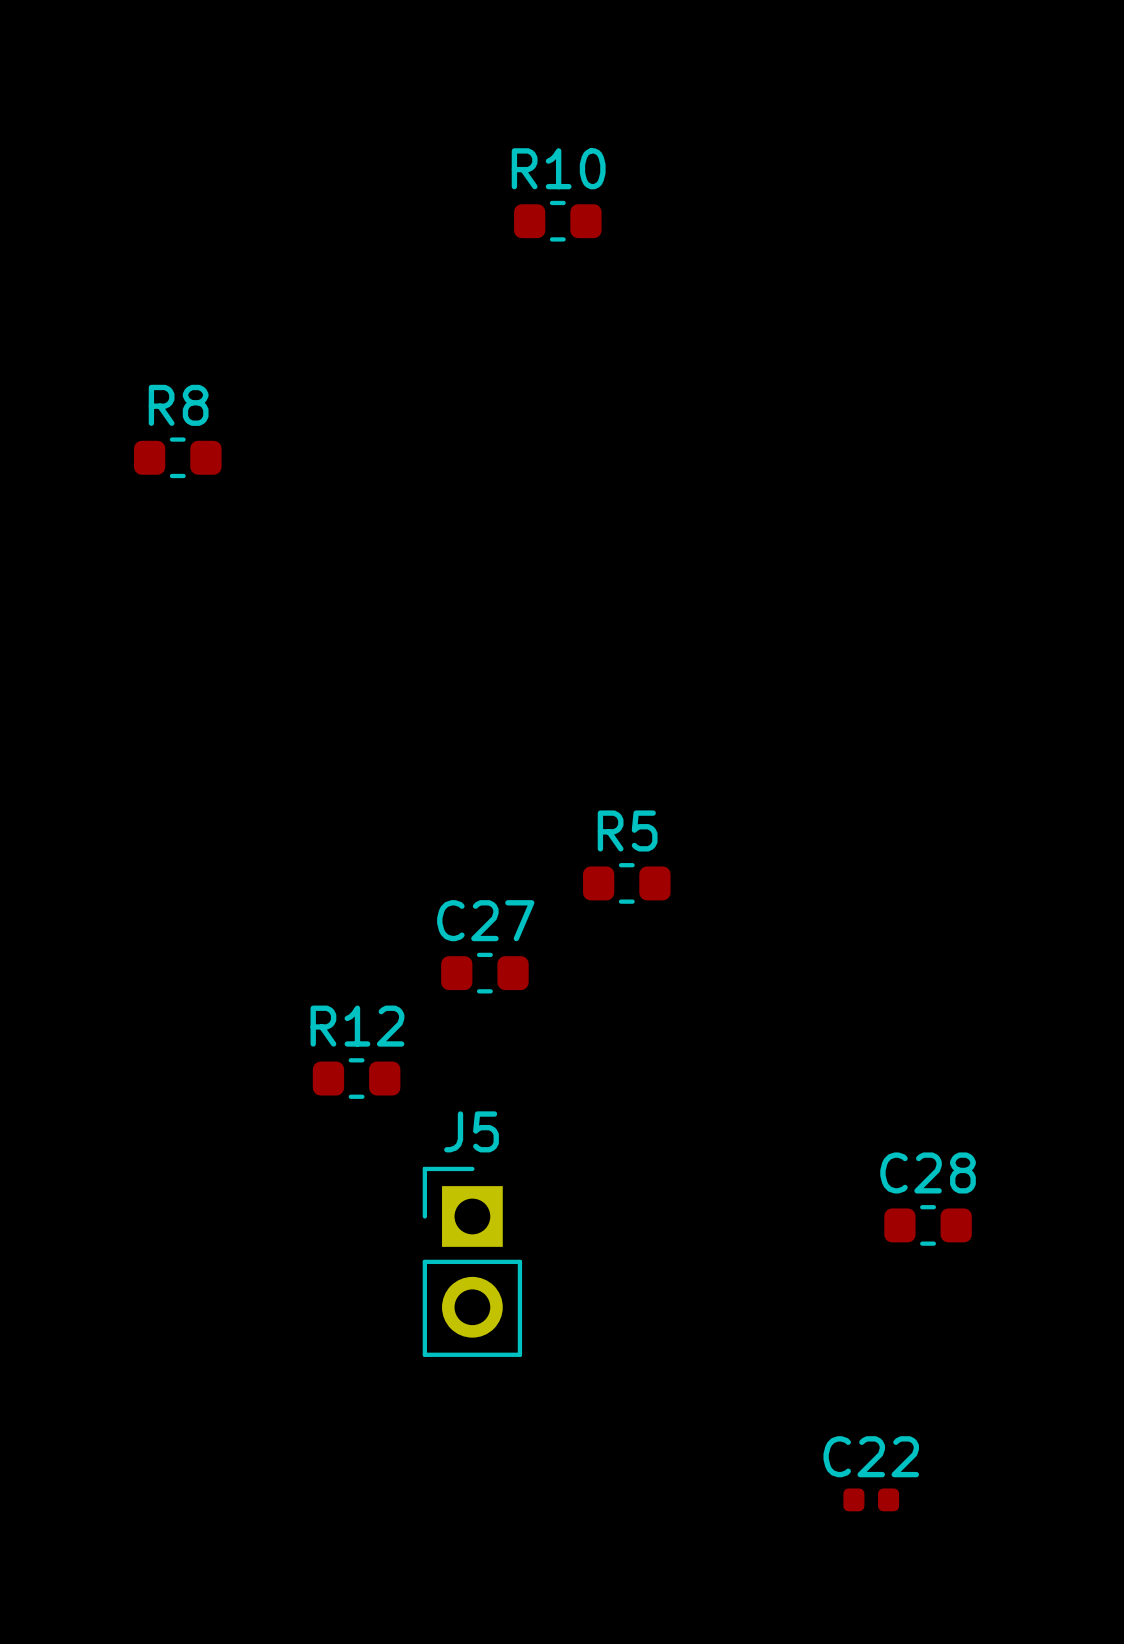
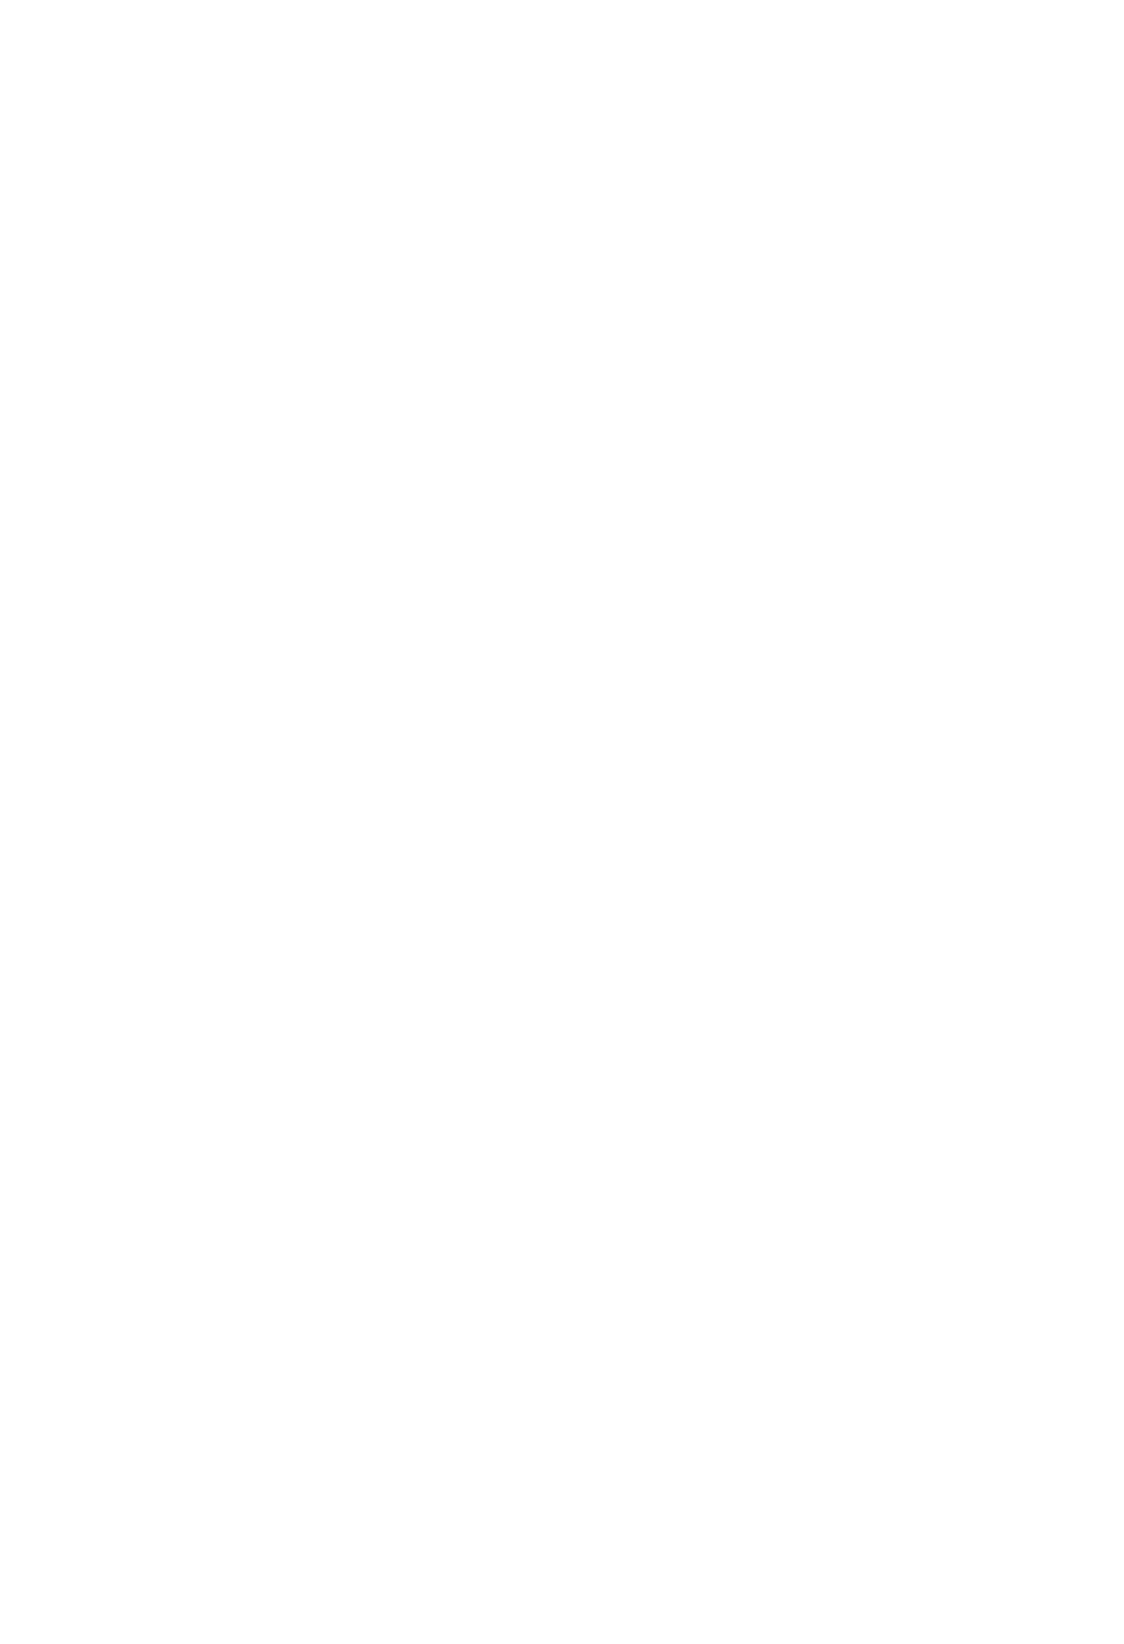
R10: (557, 221) -> none
R8: (177, 457) -> none
R5: (626, 883) -> none
C27: (484, 973) -> none
R12: (356, 1078) -> none
C28: (928, 1225) -> none
J5: (472, 1261) -> none
C22: (871, 1499) -> none

